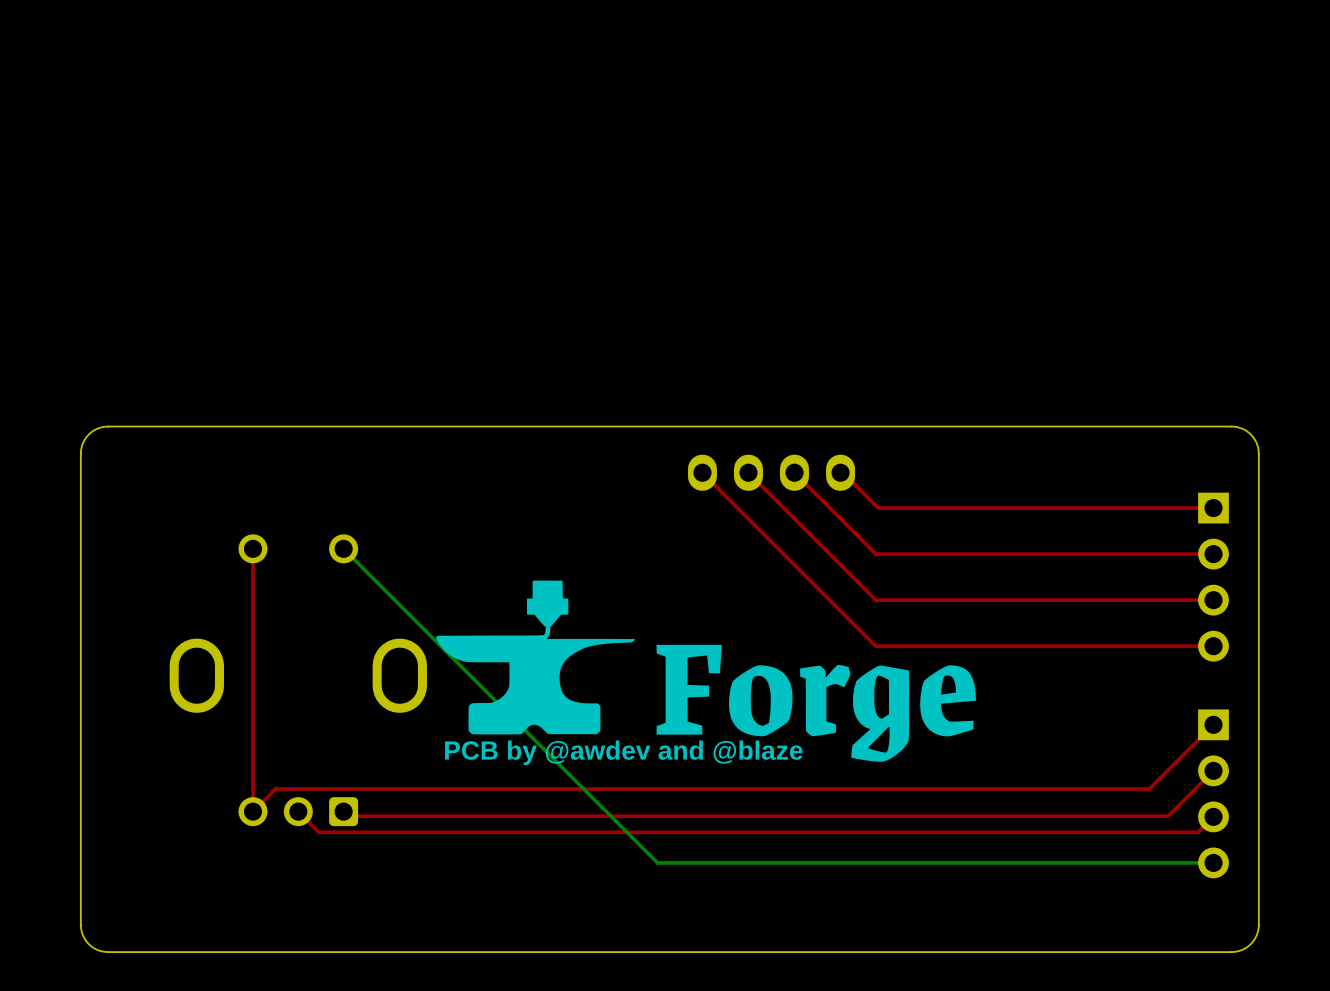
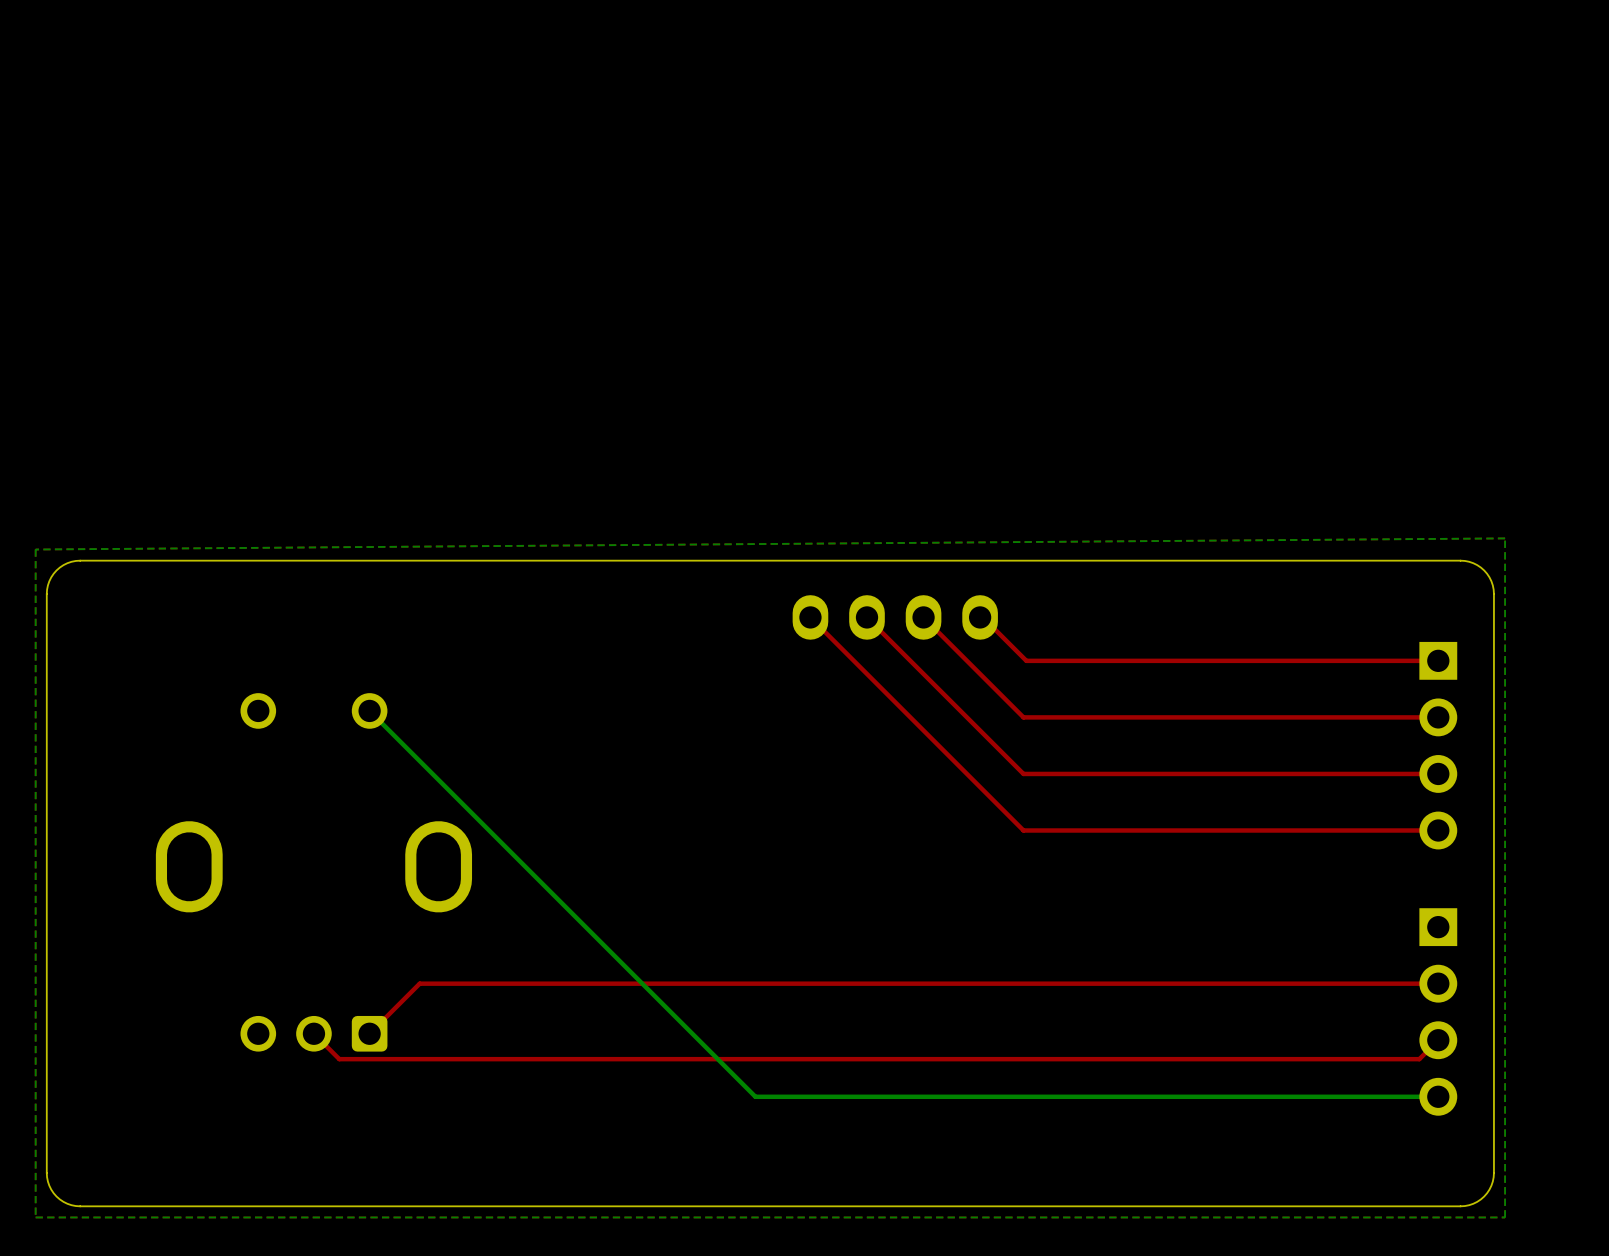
bottom zone outline: none -> (1505, 538) (35, 549) (35, 1217) (1505, 1217) (1505, 538)
top track: (253, 548) (253, 811) (275, 788) (1149, 788) (1213, 724) -> none
drawing: [436, 580, 976, 762] -> none
text: PCB by @awdev and @blaze (623, 752) -> none
top track: (1213, 770) (1168, 816) (348, 816) (343, 811) -> (1438, 983) (419, 983) (369, 1033)

